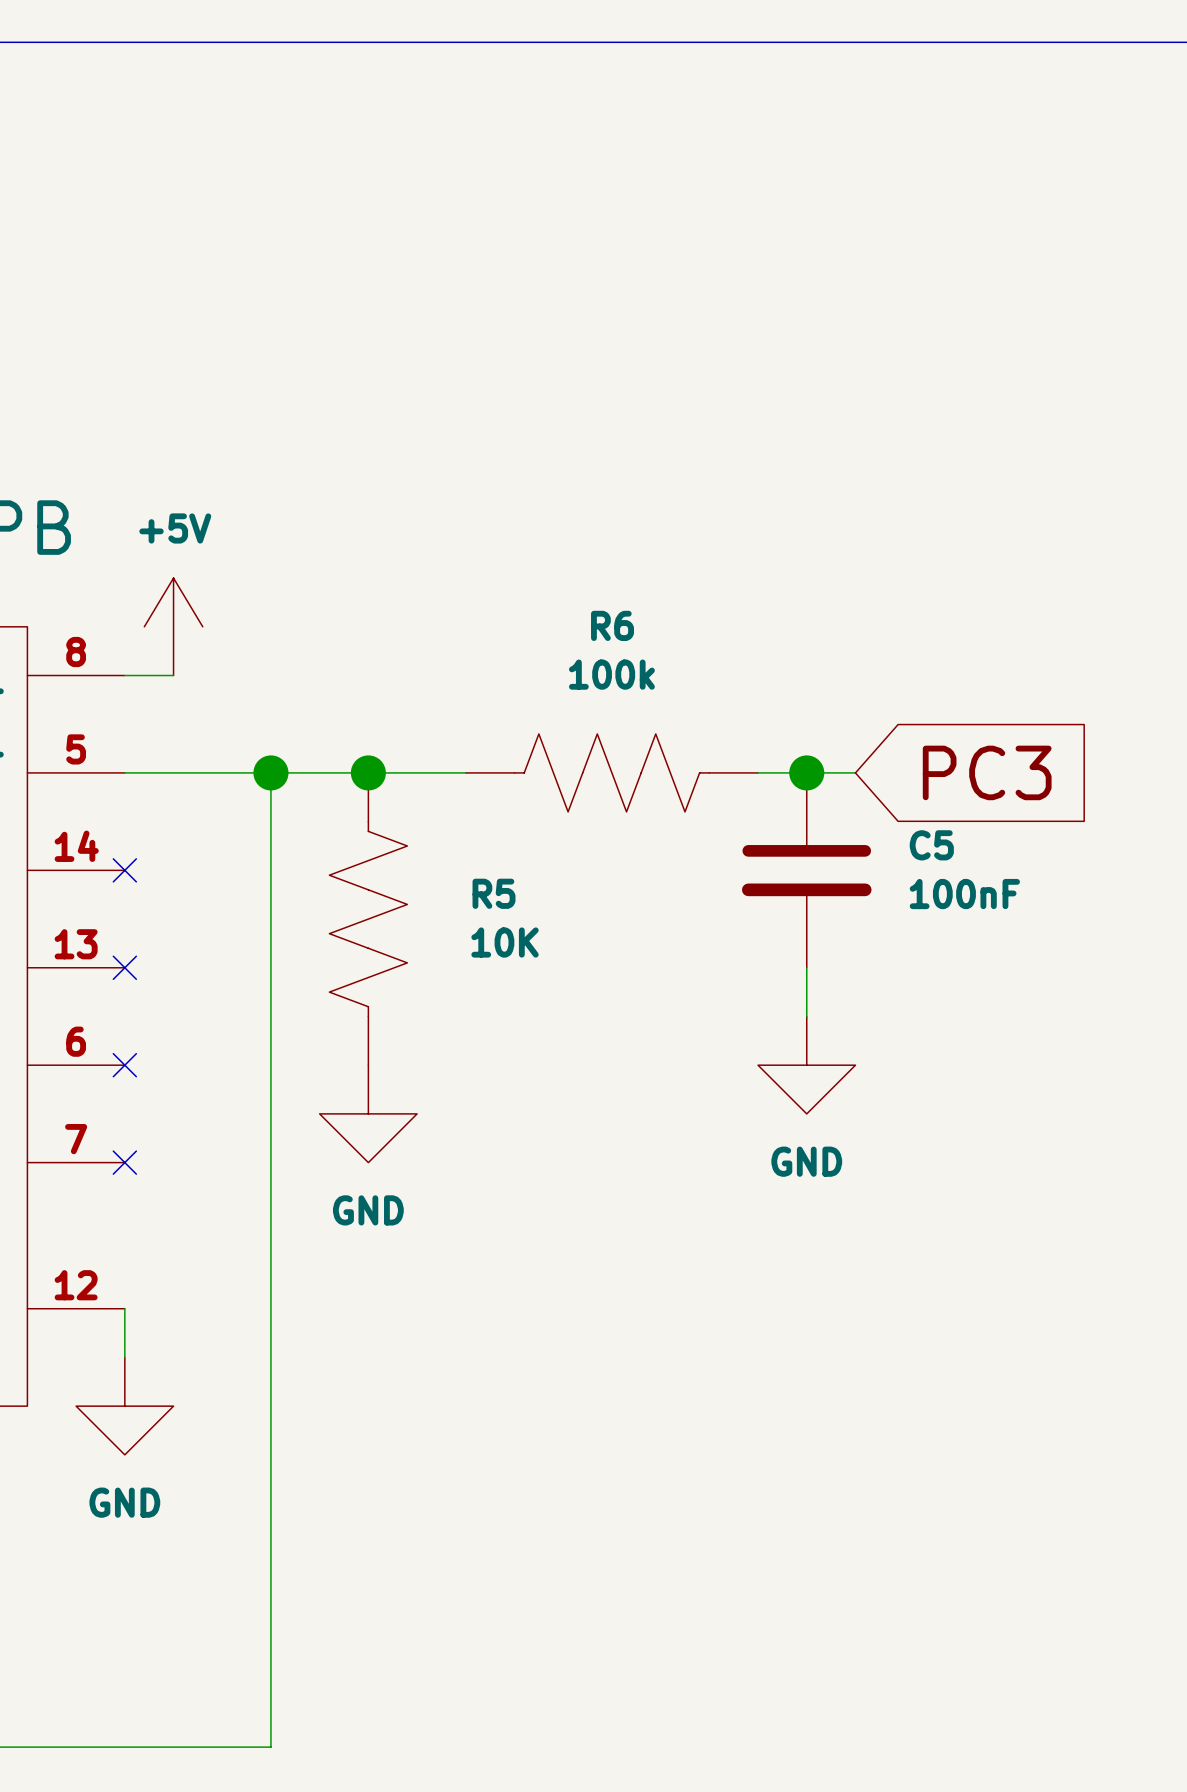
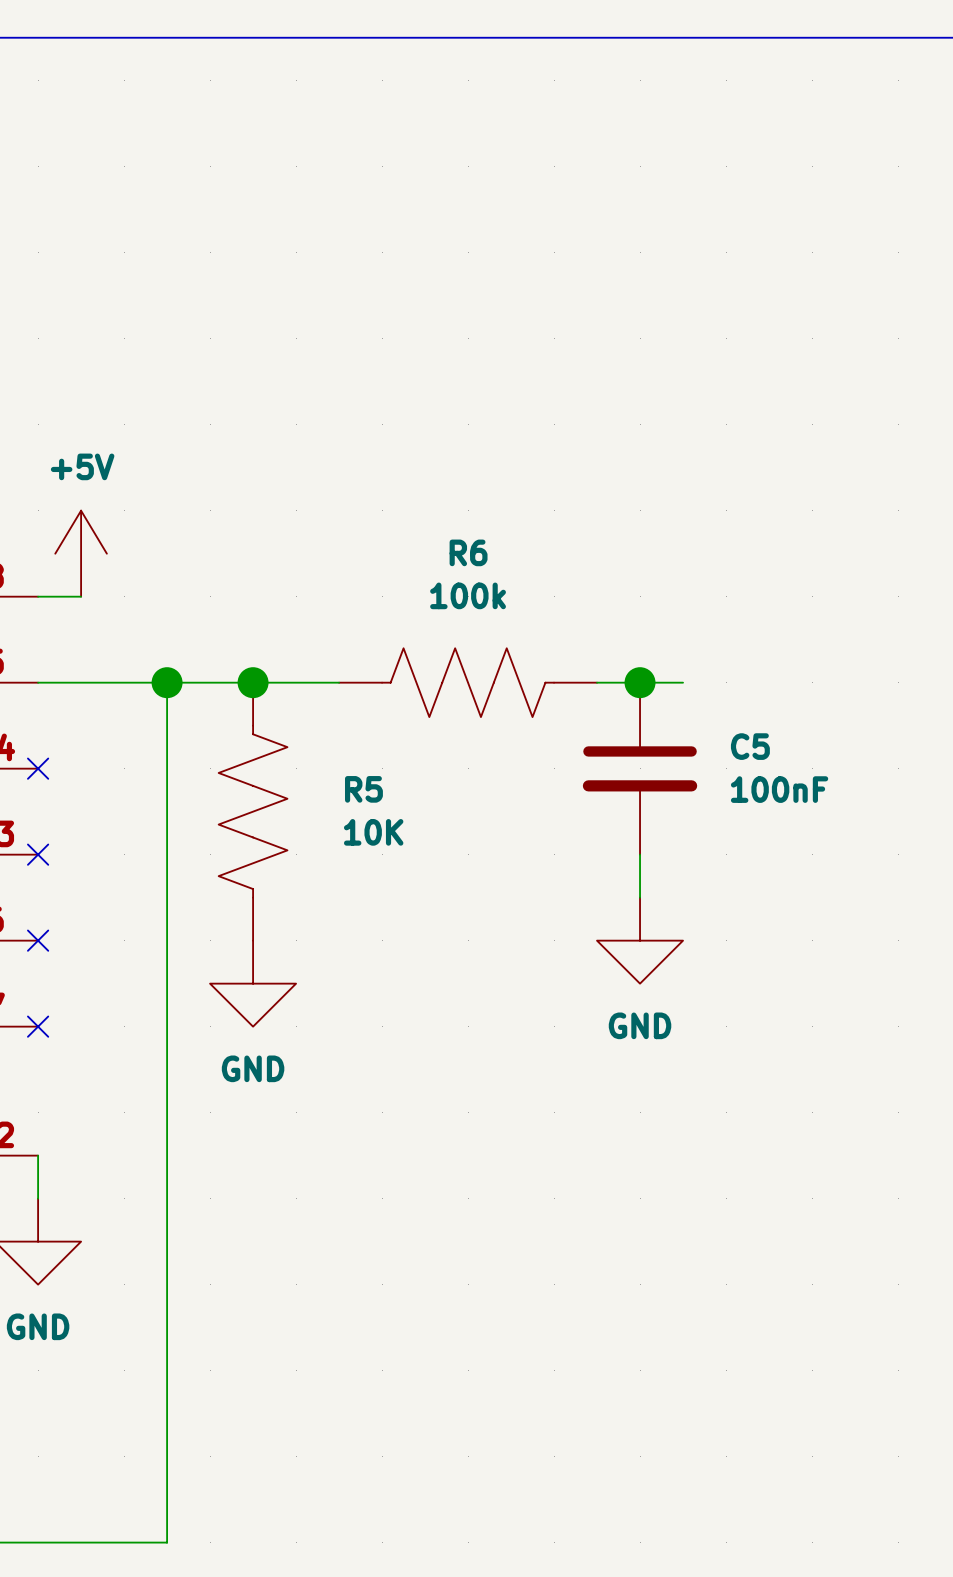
global label: PC3 (987, 772) -> none

